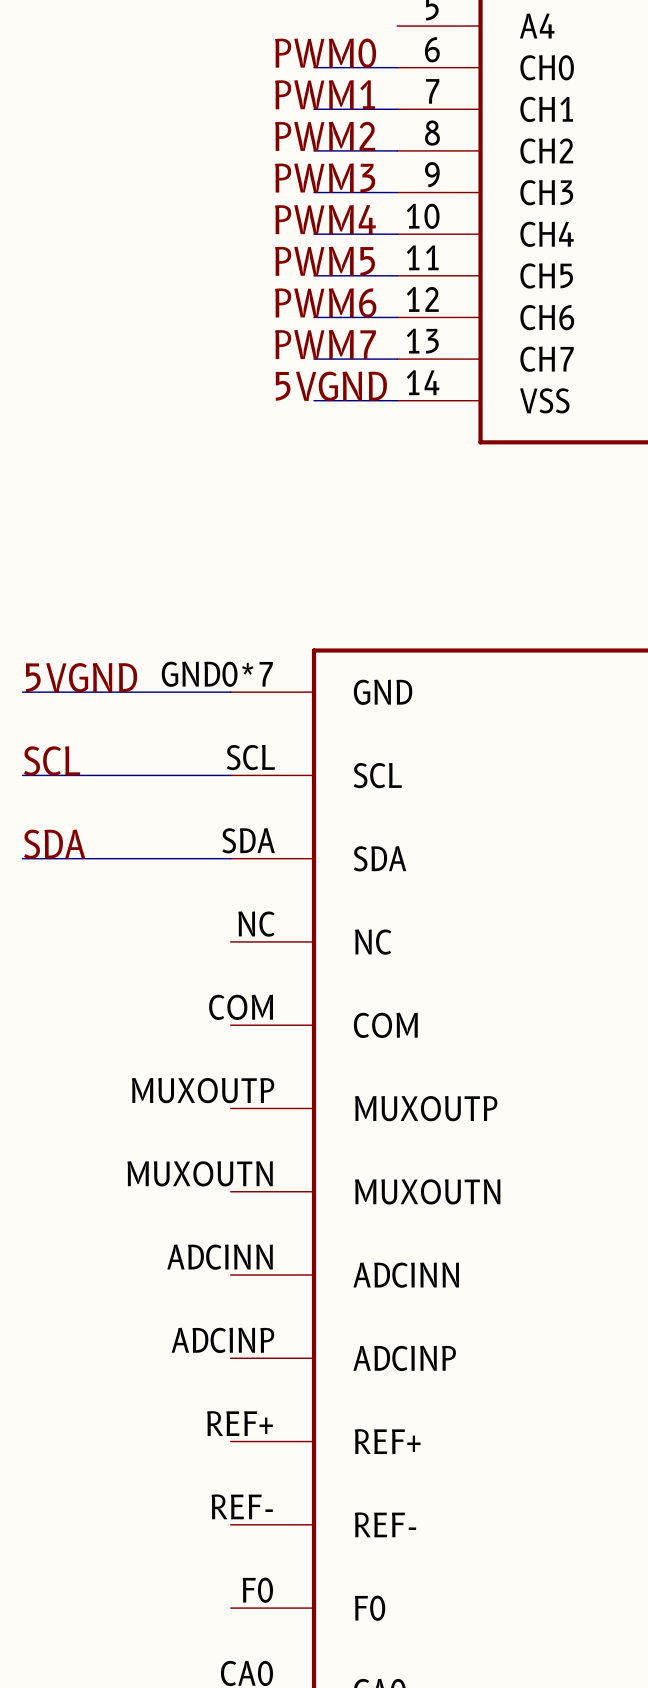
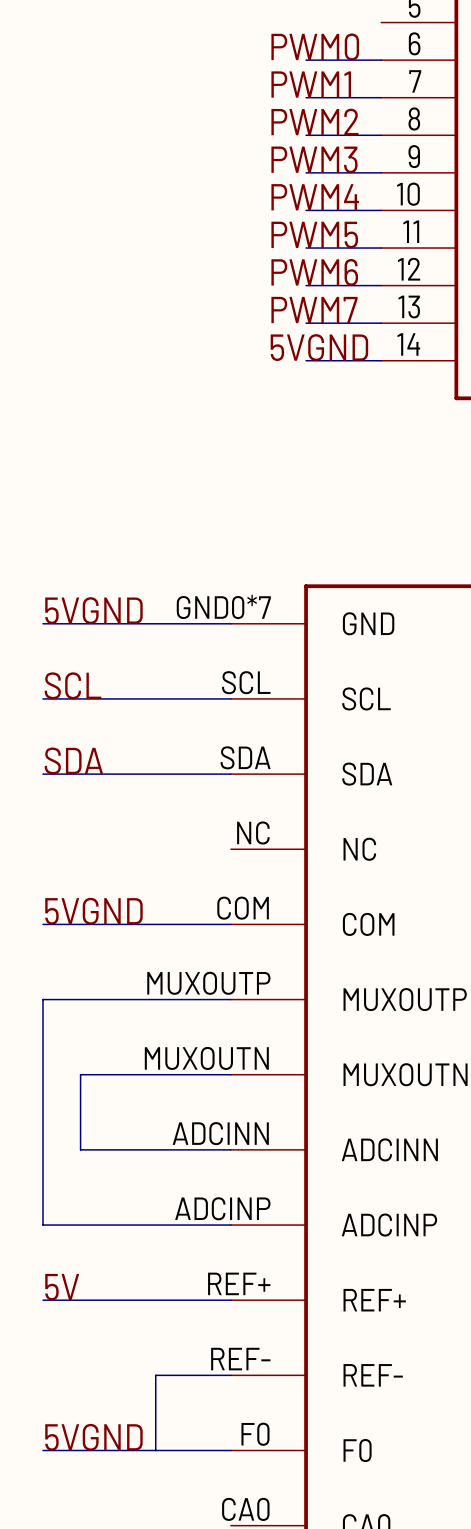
label: none -> 5VGND (93, 911)
wire: none -> (43, 924) (230, 924)
wire: none -> (230, 999) (43, 999) (43, 1225) (230, 1225)
wire: none -> (230, 1074) (80, 1074) (80, 1149) (230, 1149)
label: none -> 5V (62, 1287)
wire: none -> (43, 1300) (230, 1300)
wire: none -> (230, 1375) (155, 1375) (155, 1450)
label: none -> 5VGND (93, 1437)
wire: none -> (43, 1450) (230, 1450)

